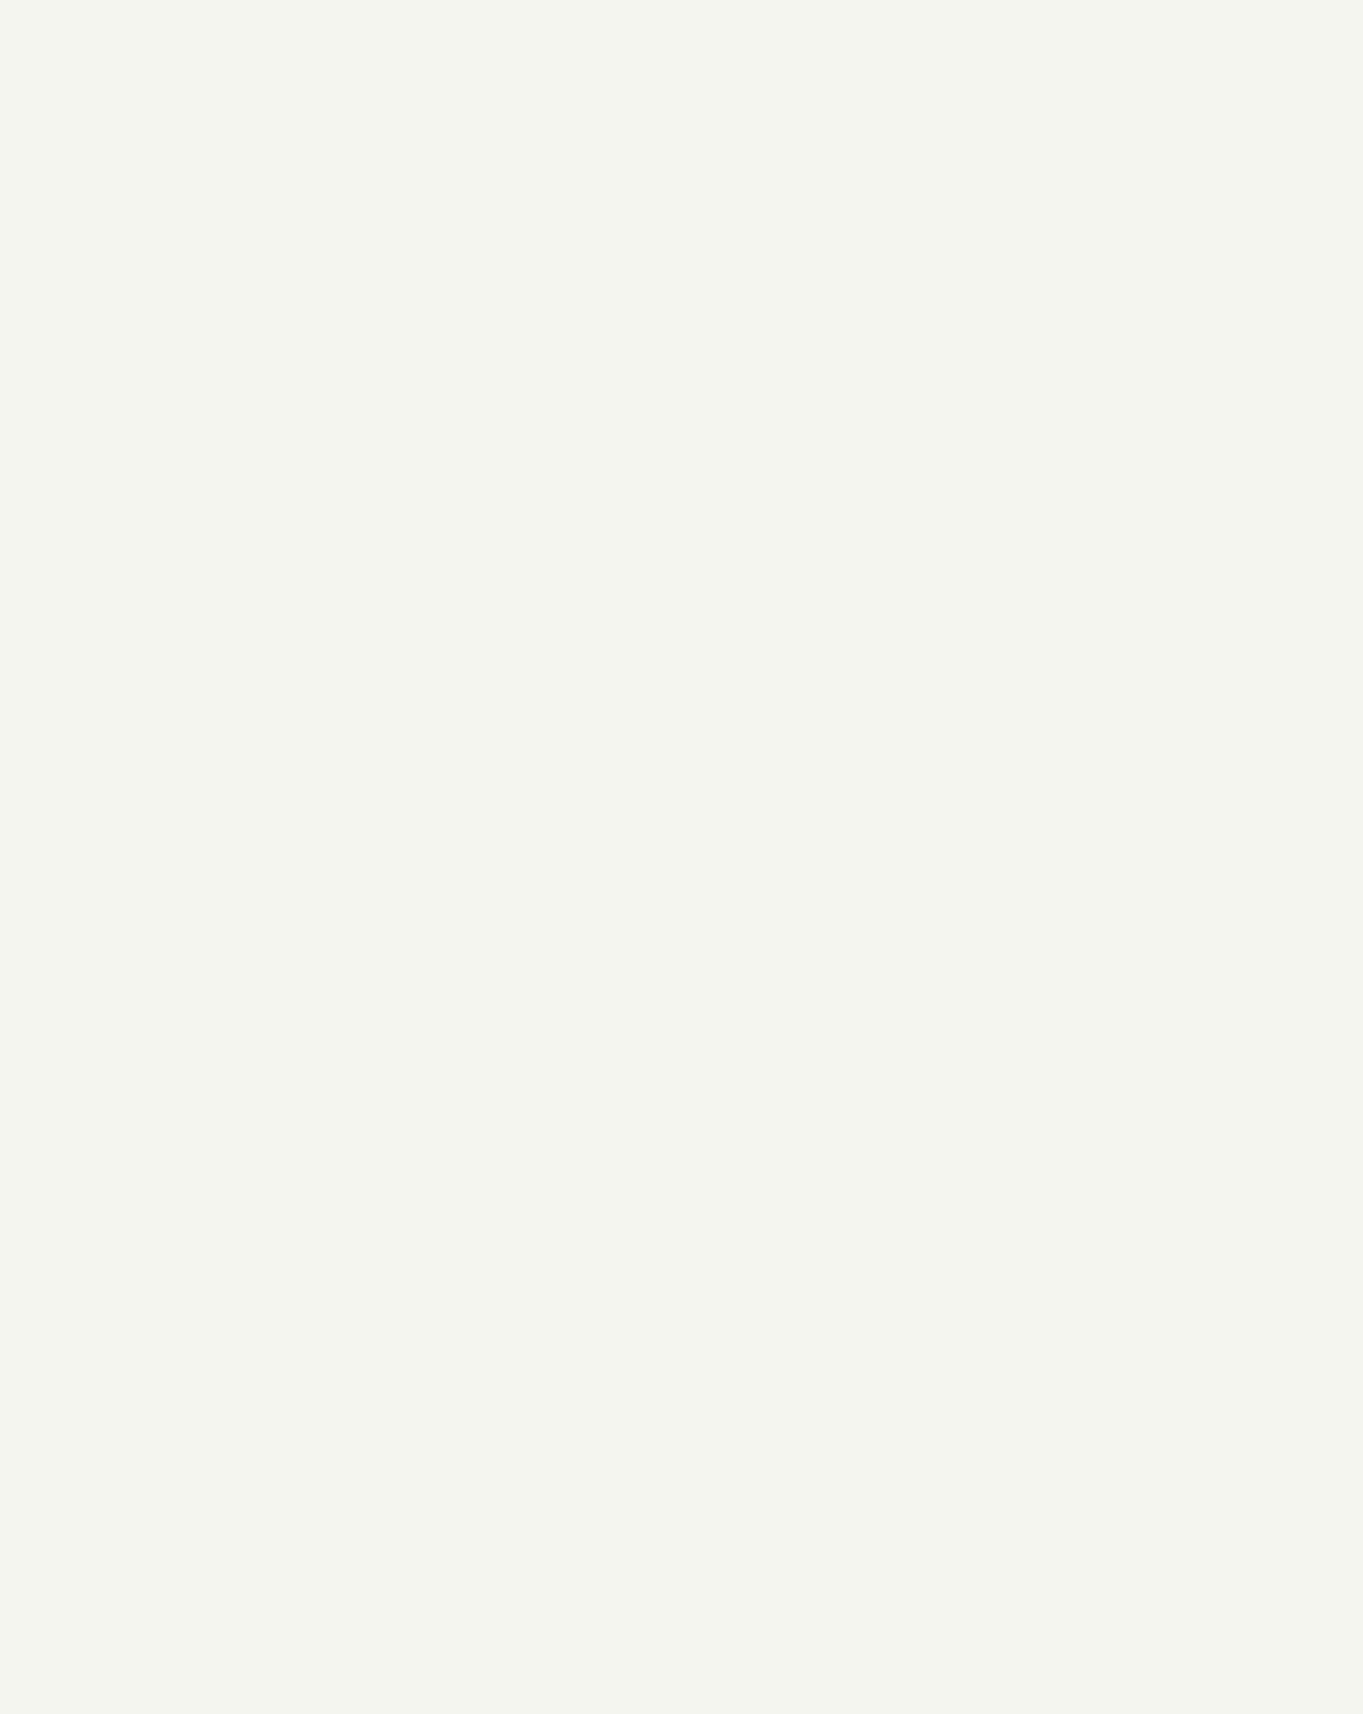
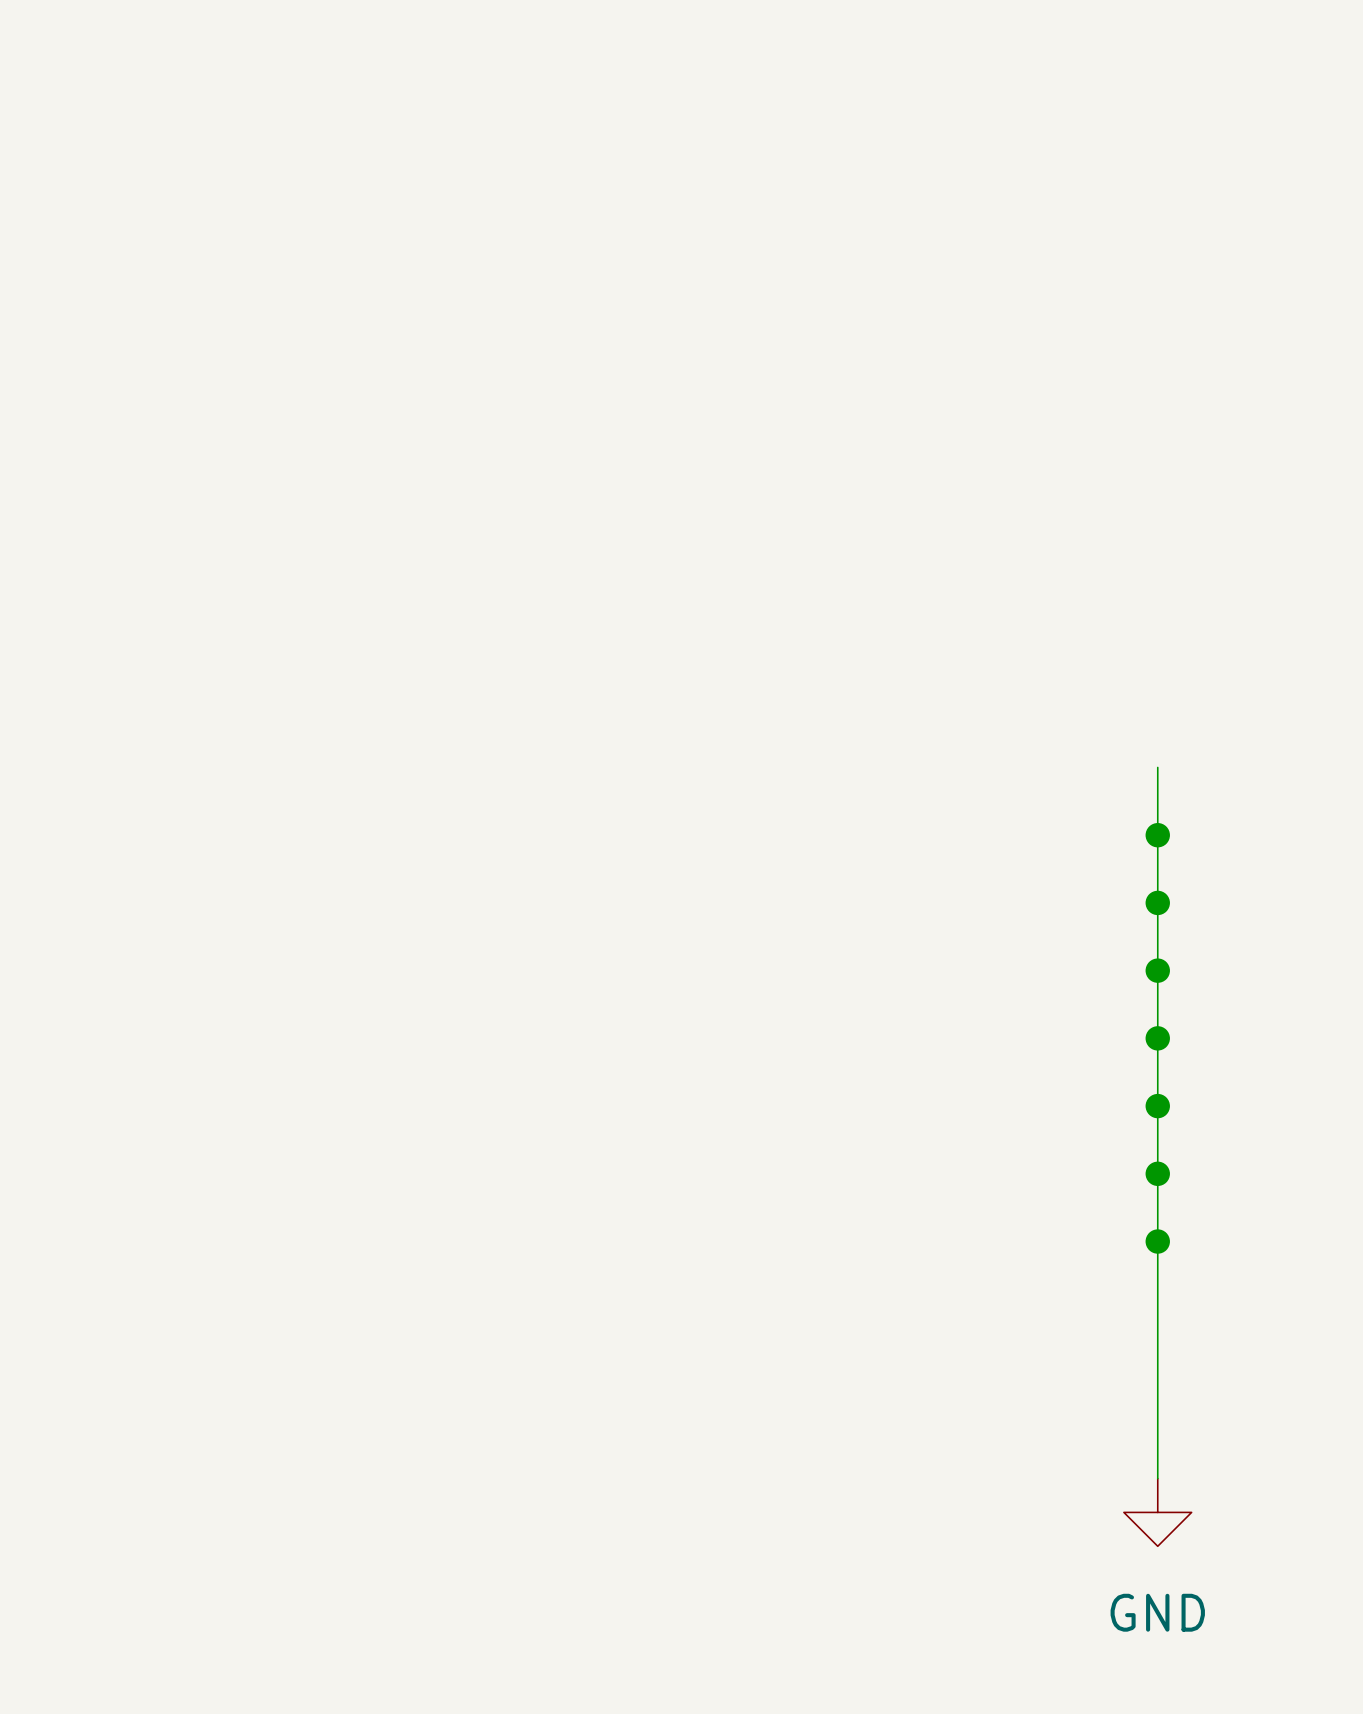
wire: none -> (1157, 767) (1157, 1478)
junction: none -> (1157, 835)
junction: none -> (1157, 902)
junction: none -> (1157, 970)
junction: none -> (1157, 1038)
junction: none -> (1157, 1106)
junction: none -> (1157, 1173)
junction: none -> (1157, 1241)
power symbol: none -> GND (1157, 1512)

